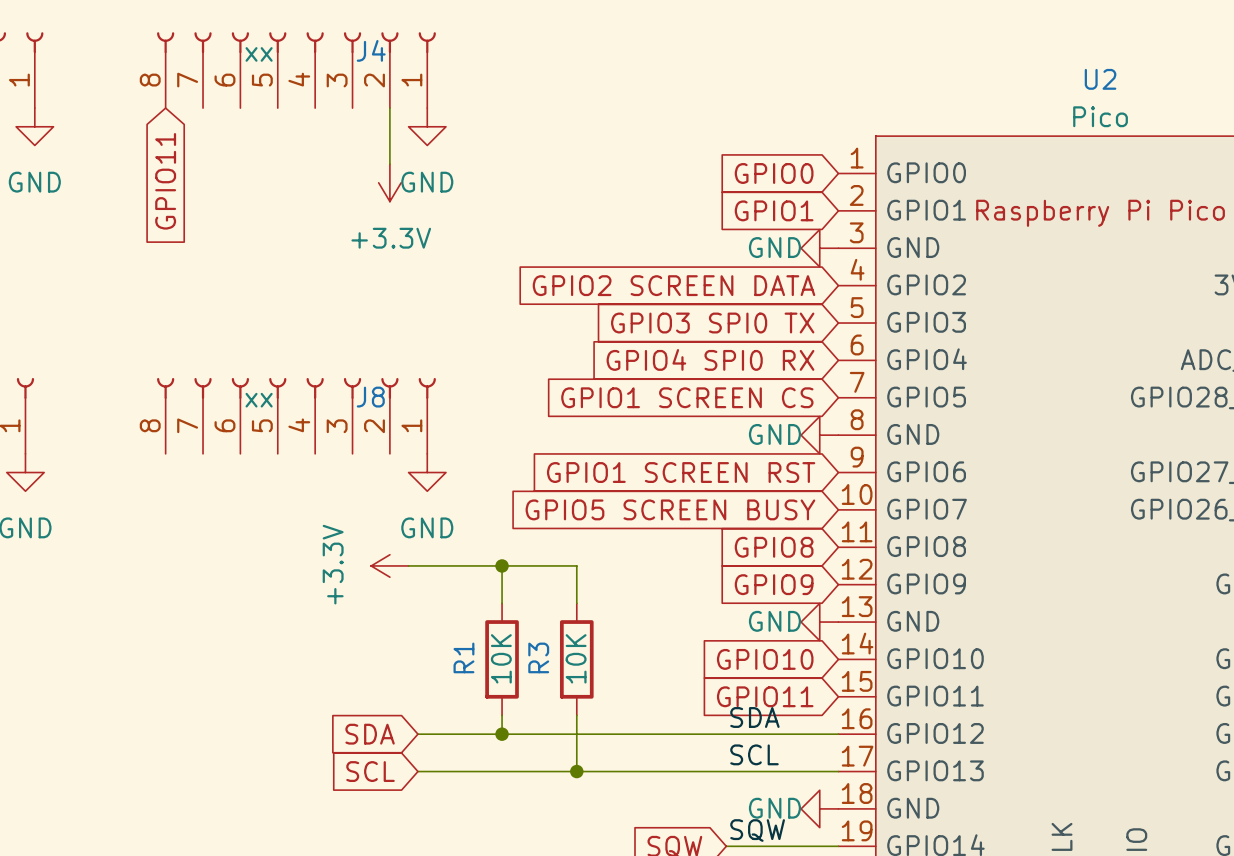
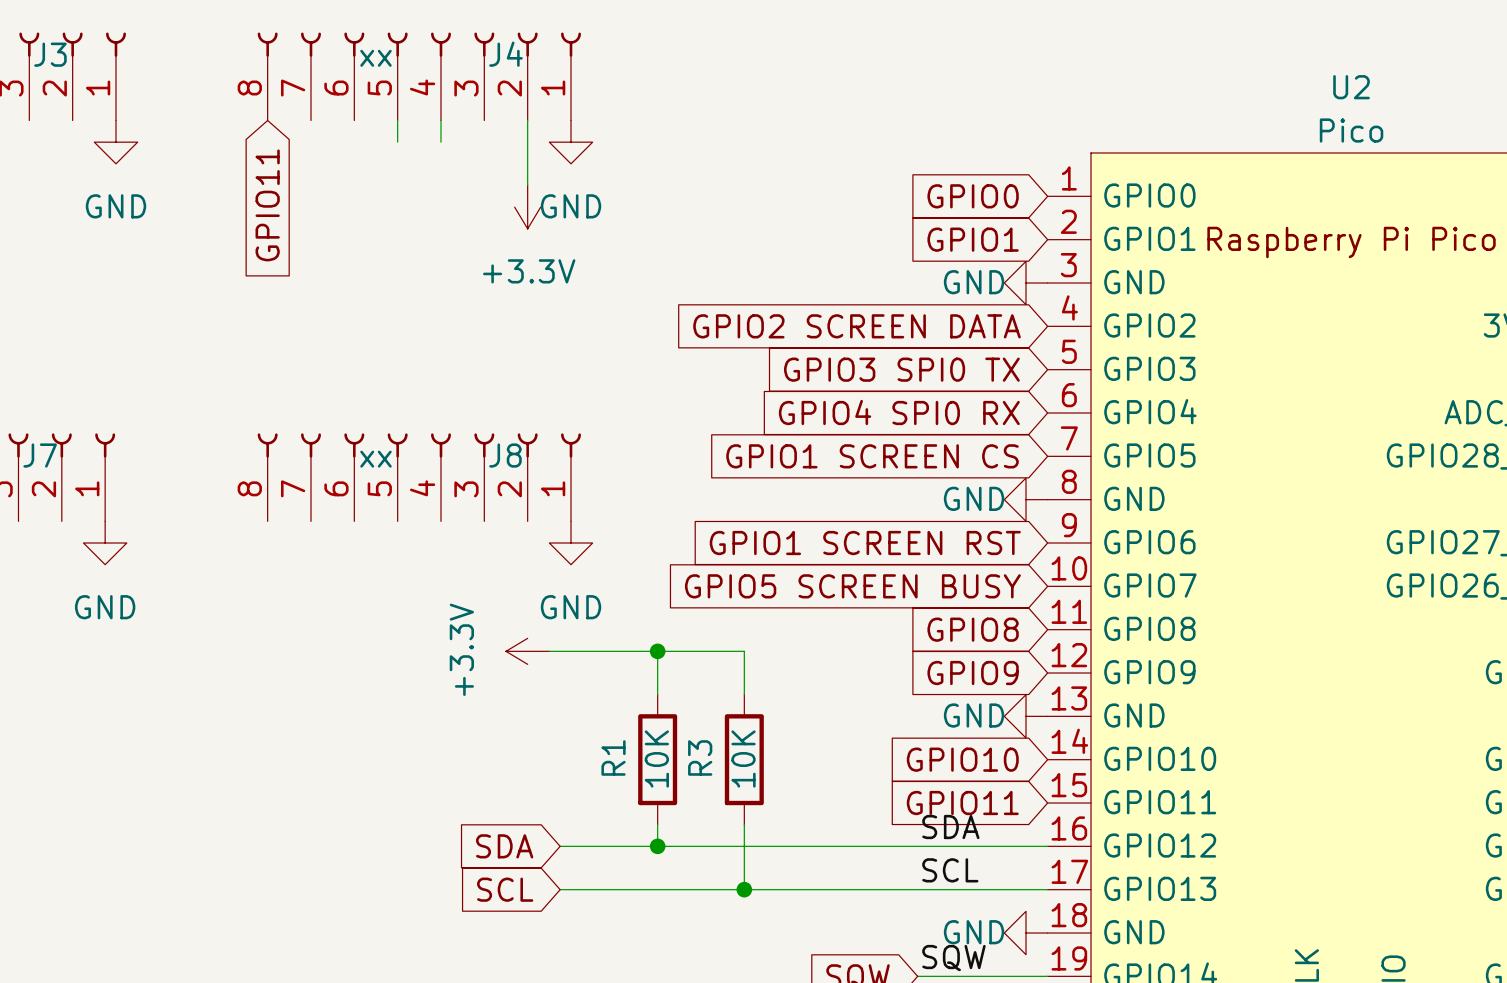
wire: none -> (397, 120) (397, 142)
wire: none -> (440, 120) (440, 142)

